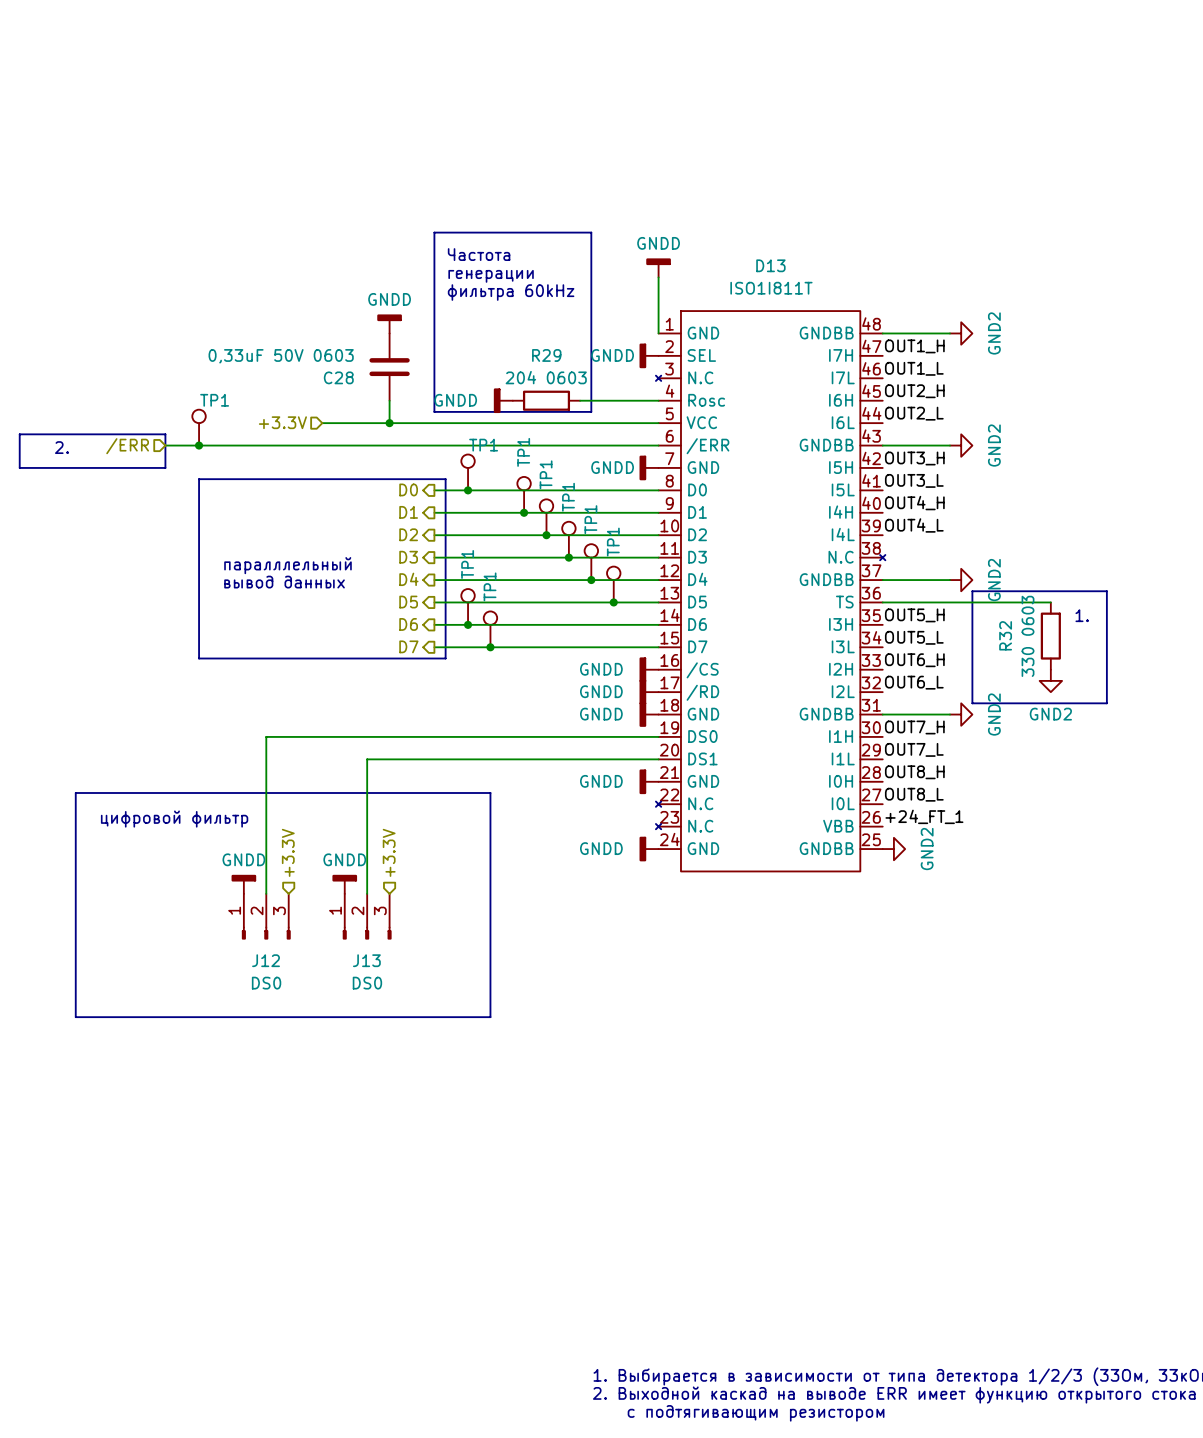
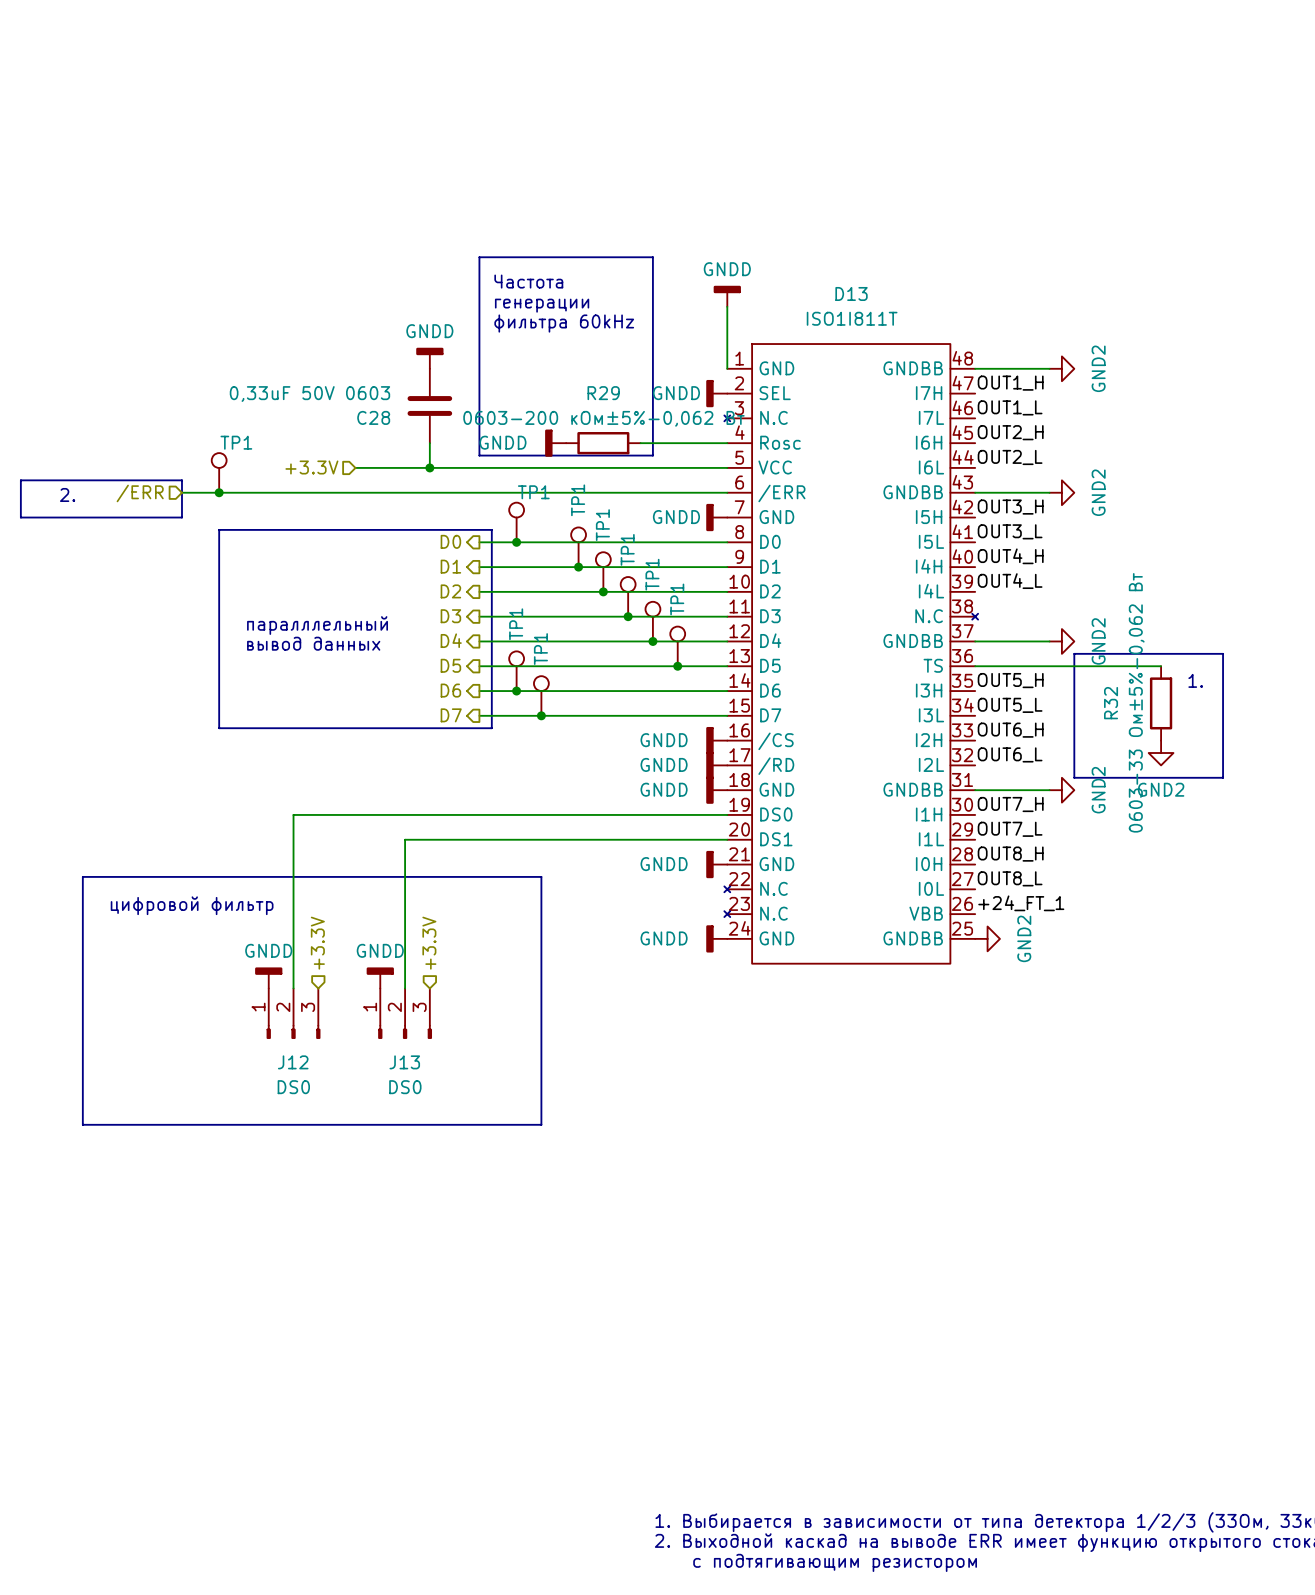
R29 value: 204 0603 (546, 377) -> 0603-200 кОм±5%-0,062 Вт (603, 418)
R32 value: 330 0603 (1028, 636) -> 0603-33 Ом±5%-0,062 Вт (1136, 702)

